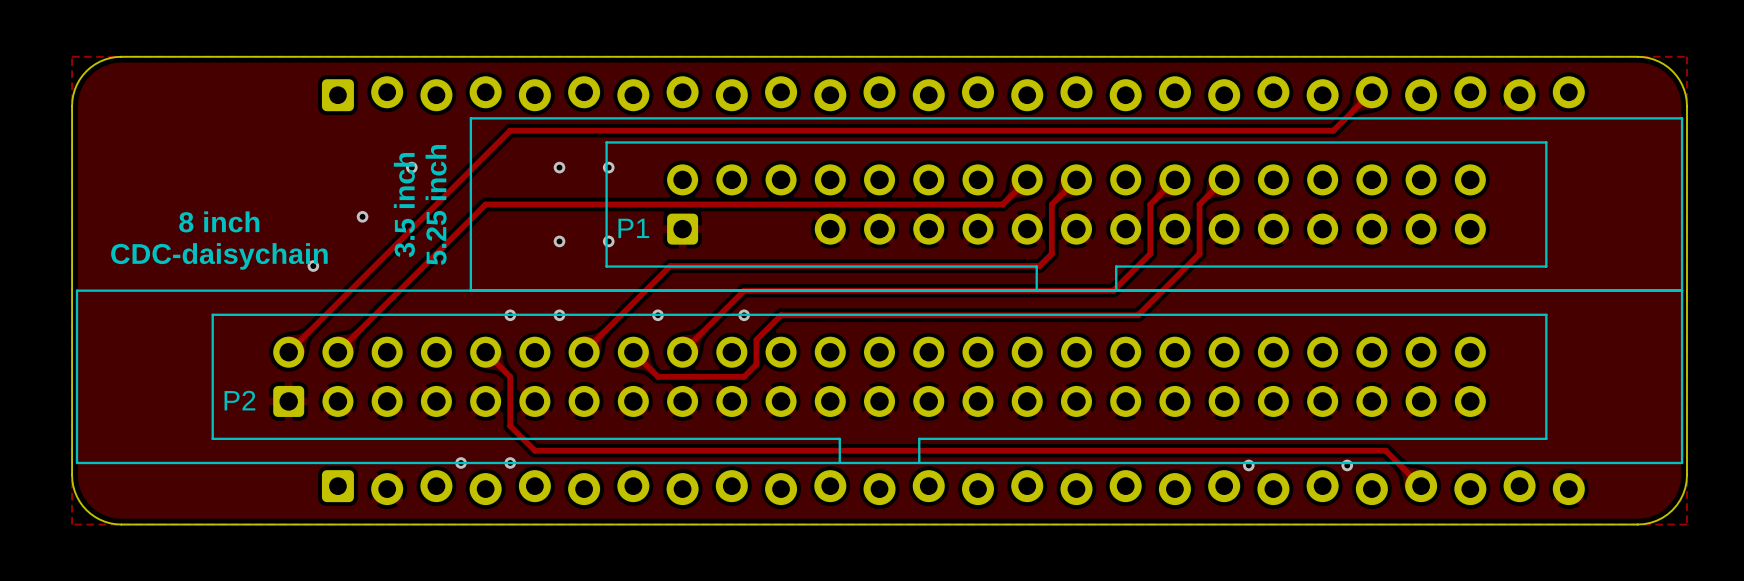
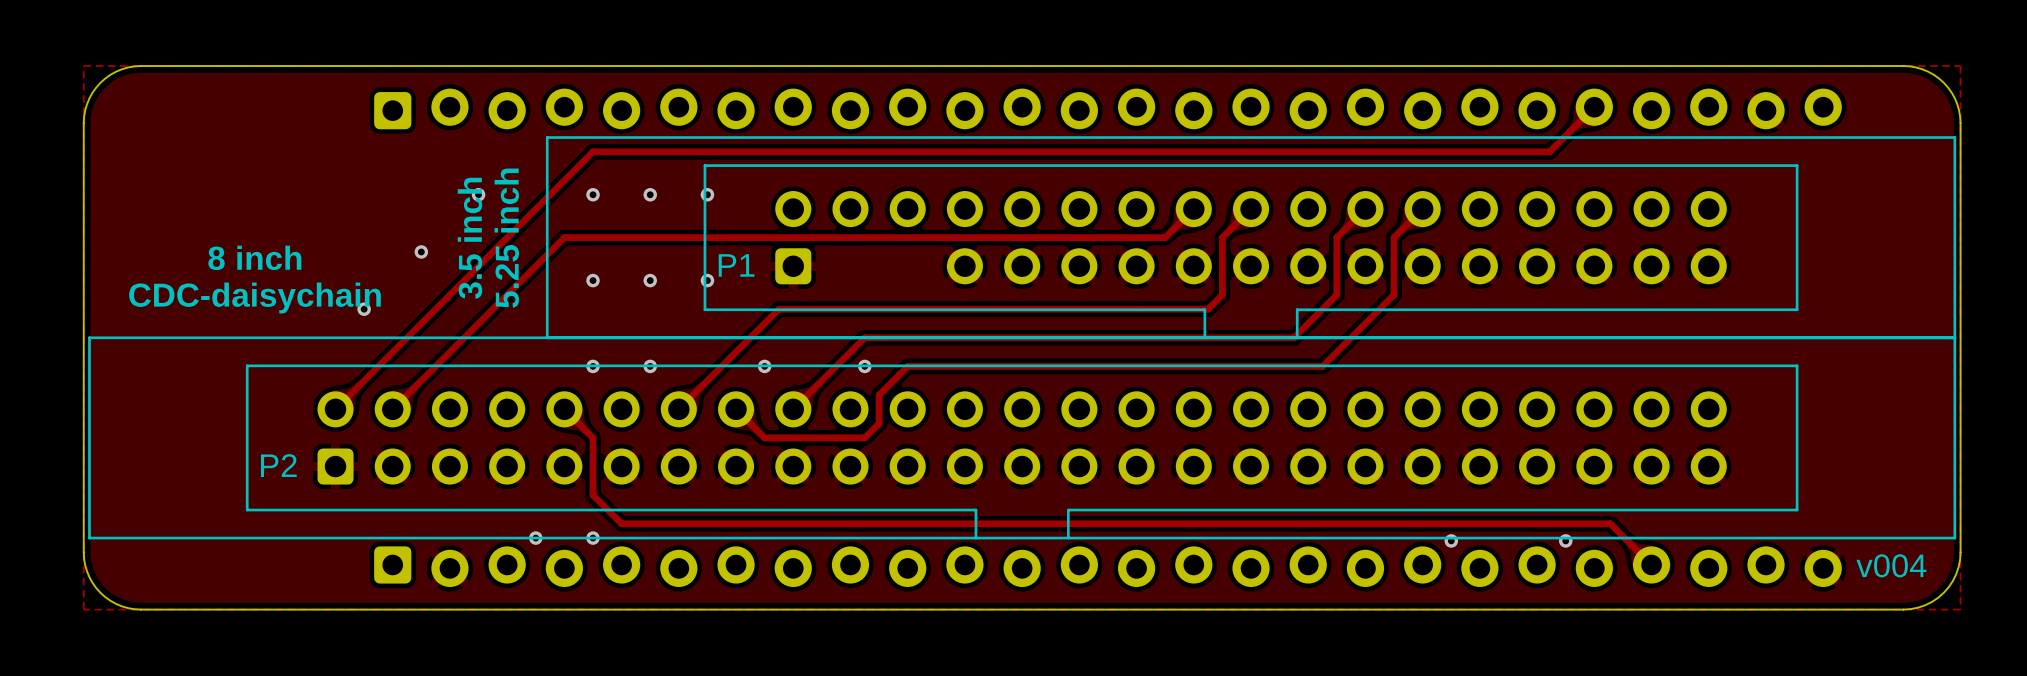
via: none -> (593, 194)
via: none -> (593, 280)
text: none -> v004 (1891, 565)

